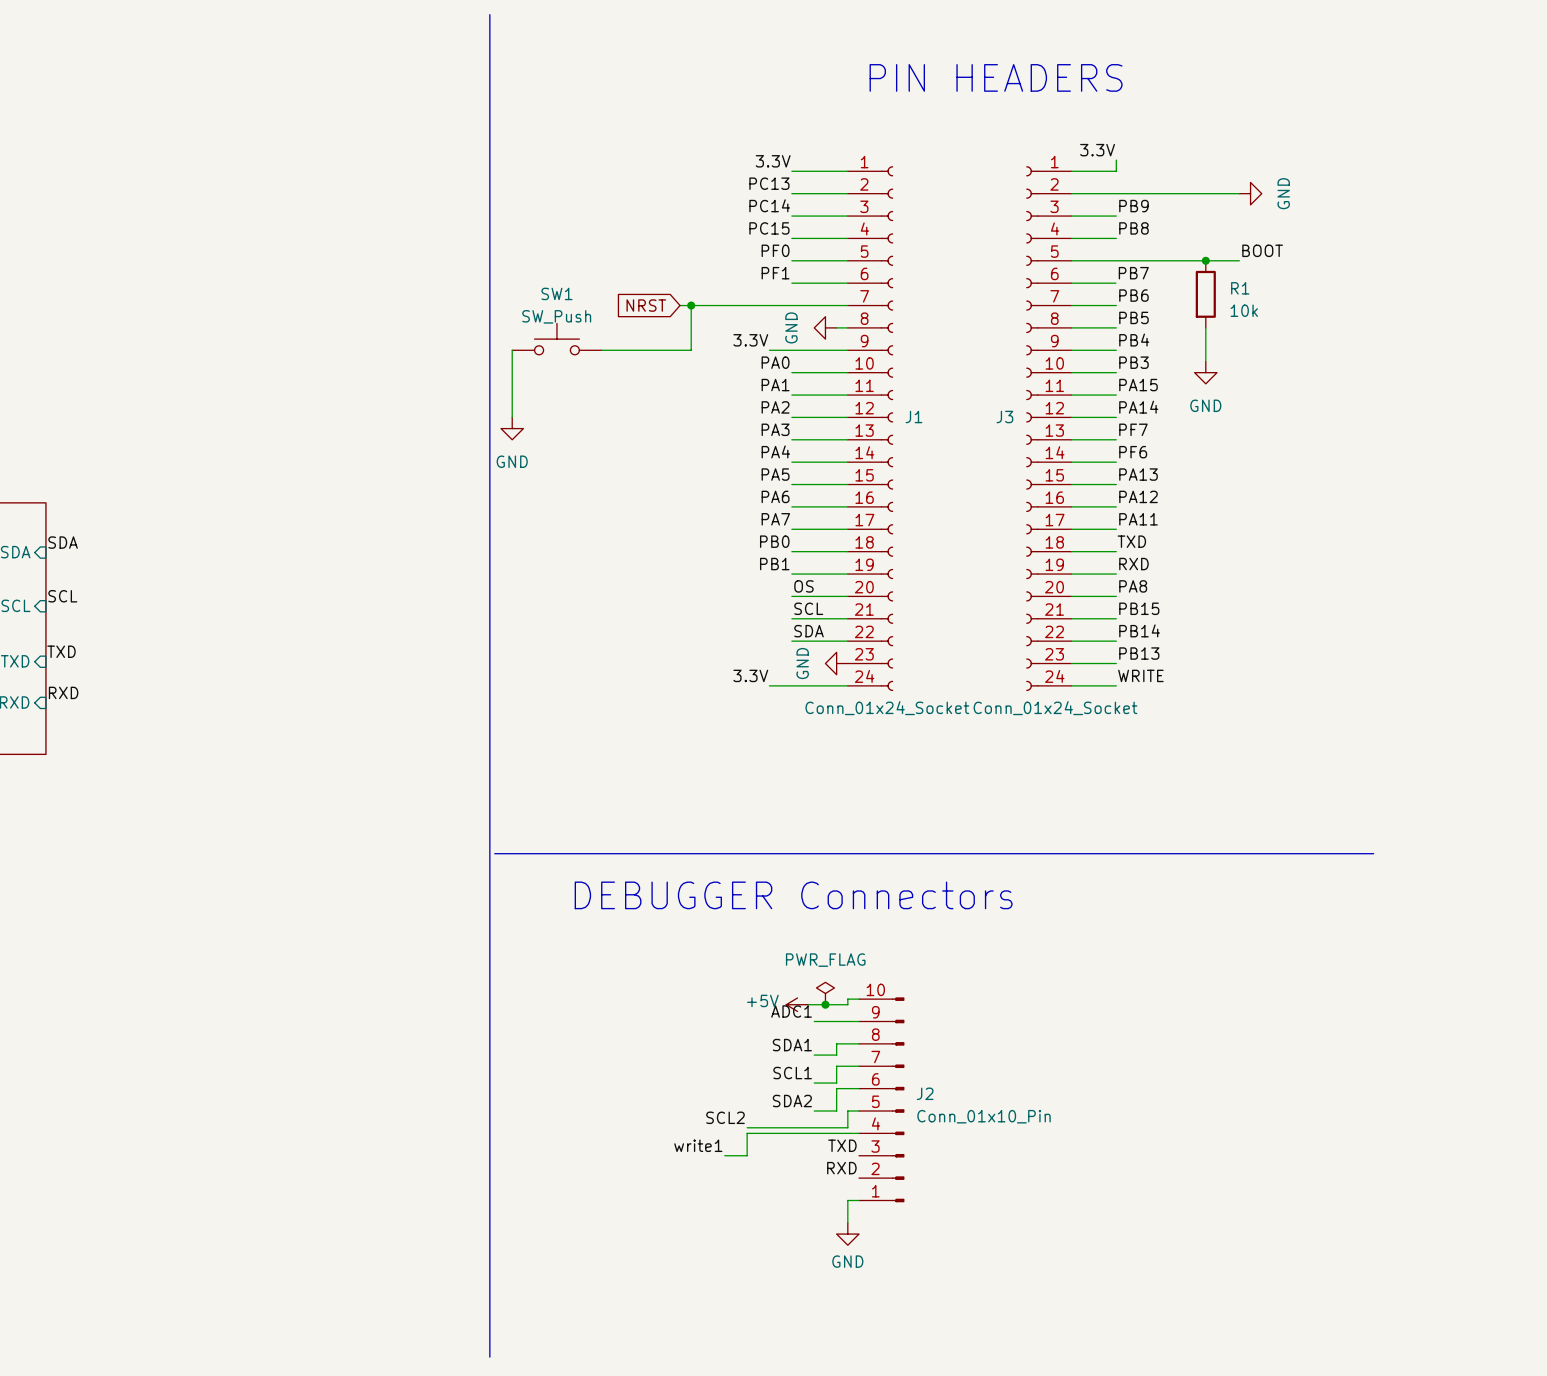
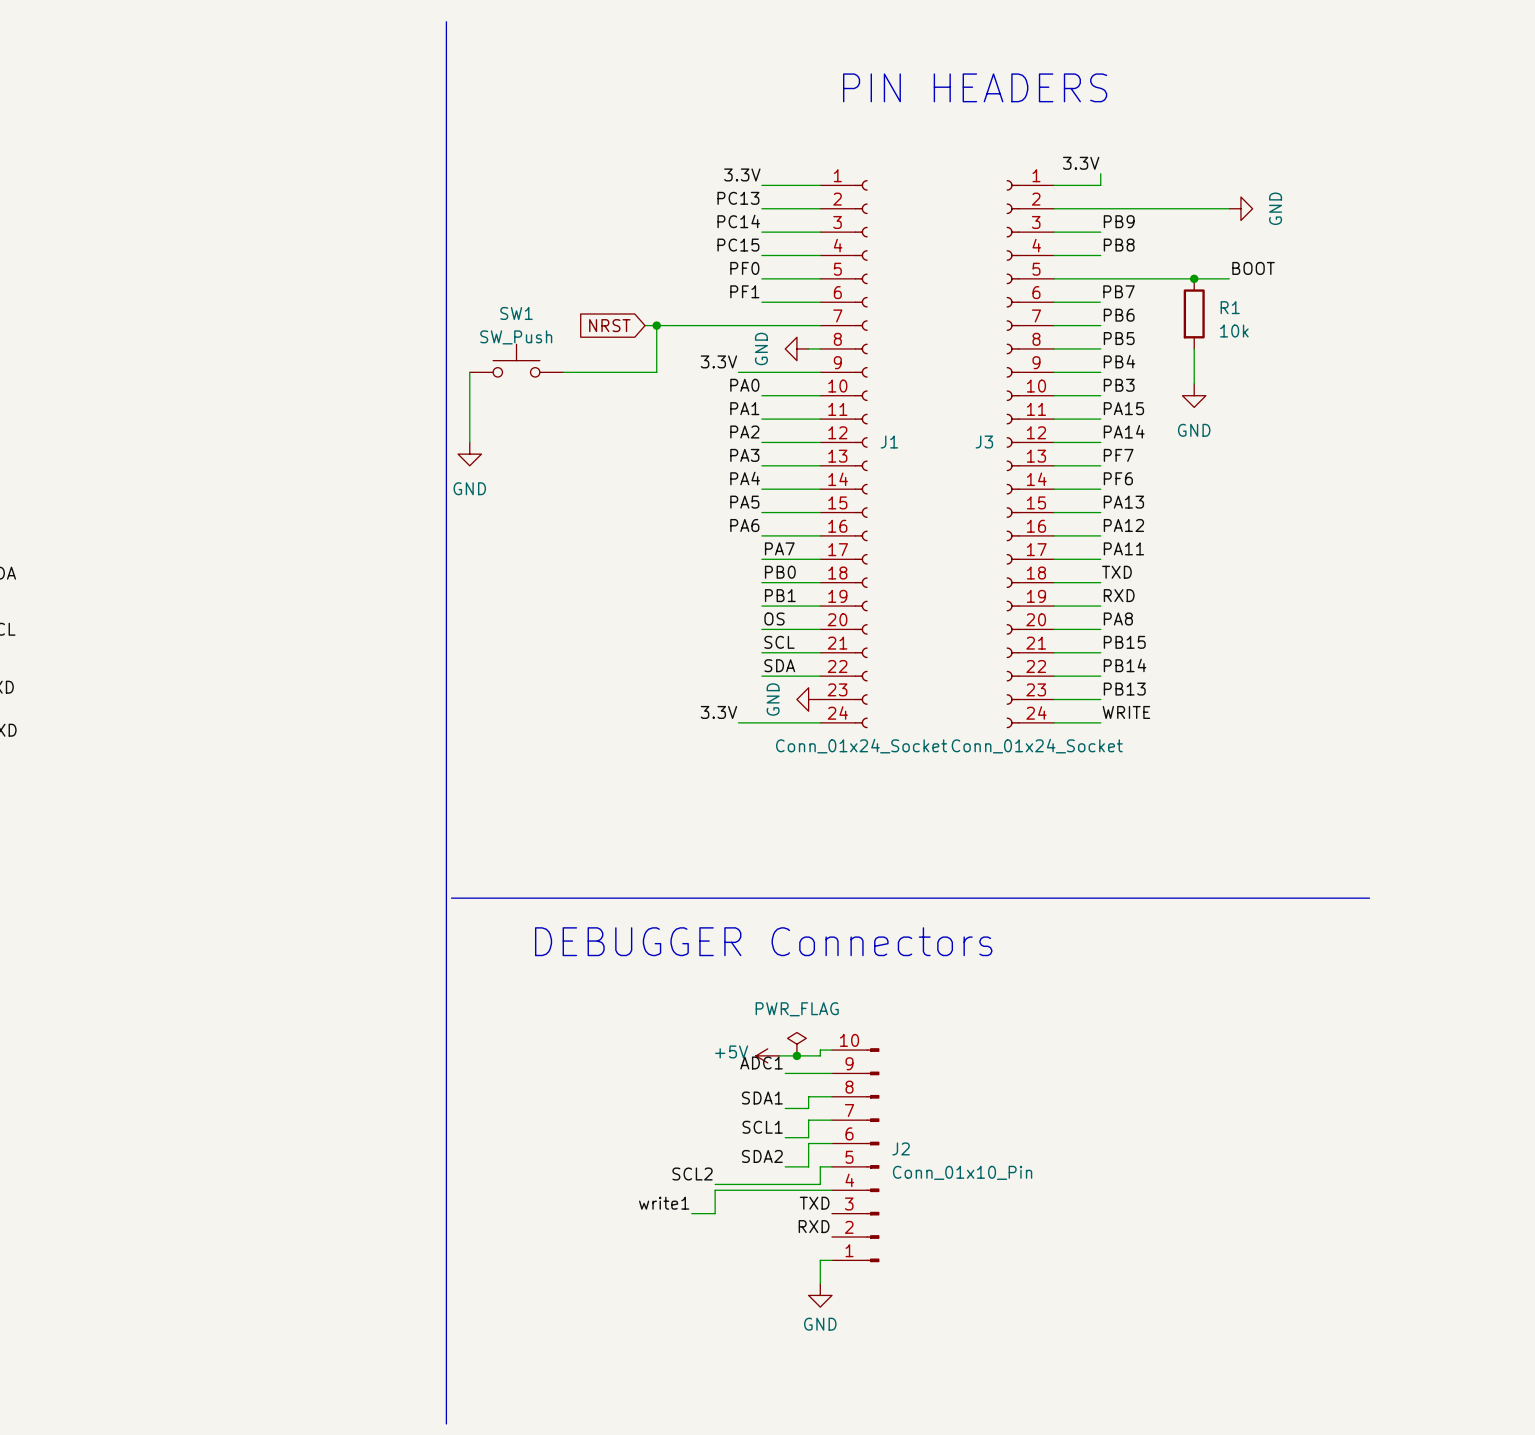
label position: PA7 (775, 519) -> PA7 (779, 548)
label position: PB0 (774, 541) -> PB0 (780, 572)
label position: PB1 (774, 564) -> PB1 (780, 595)

